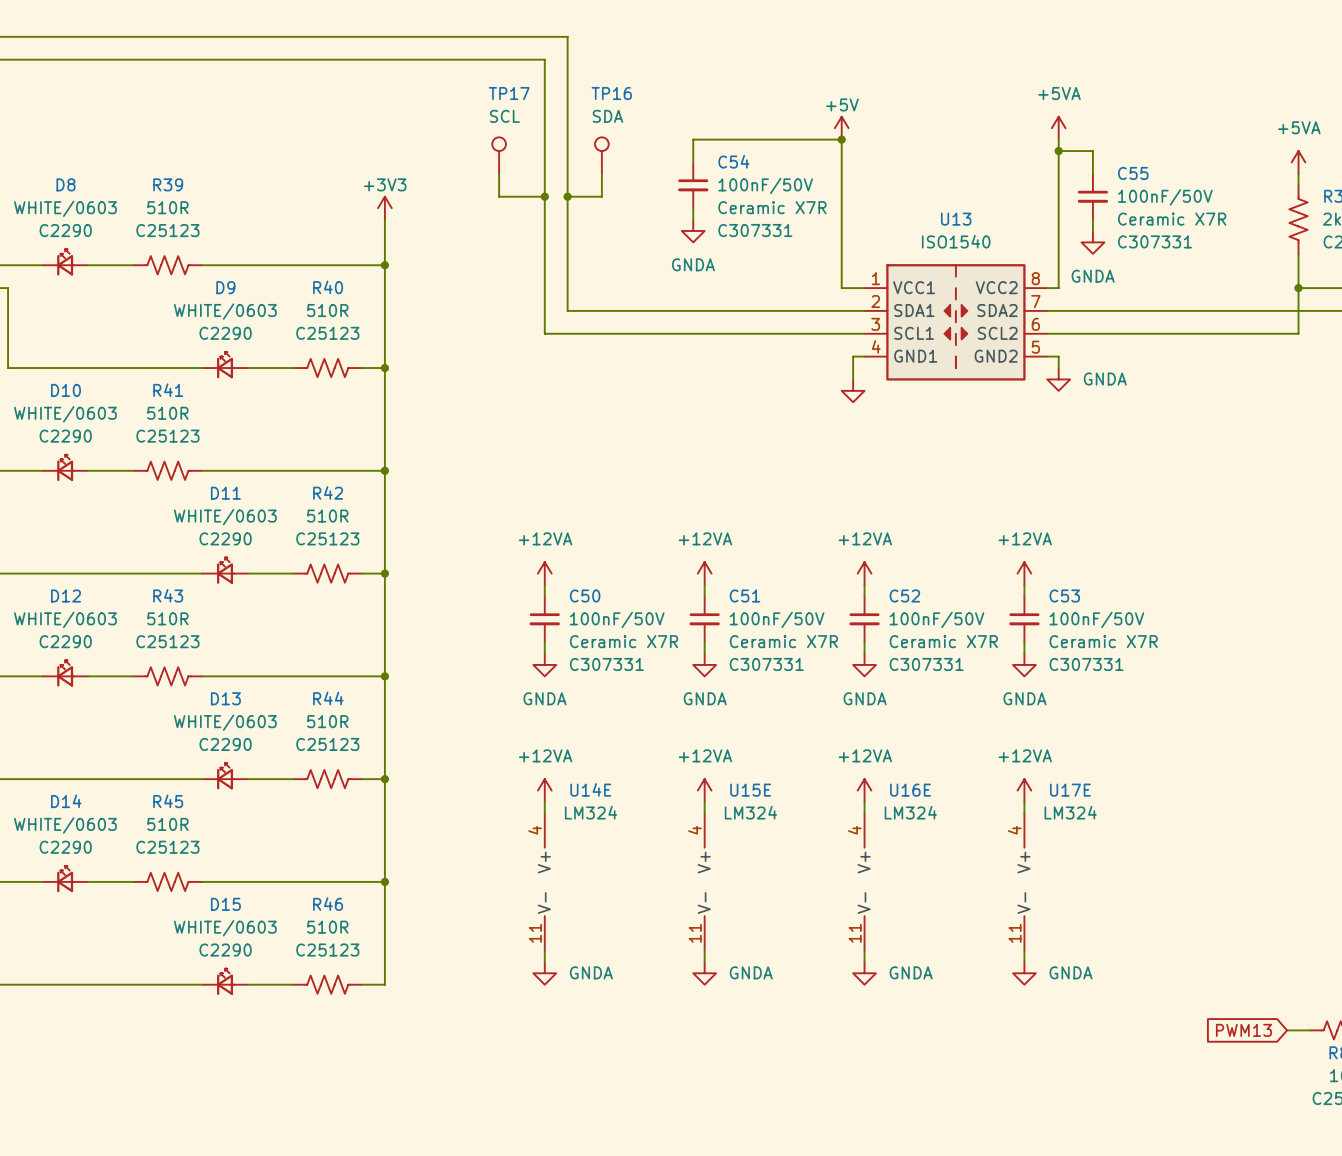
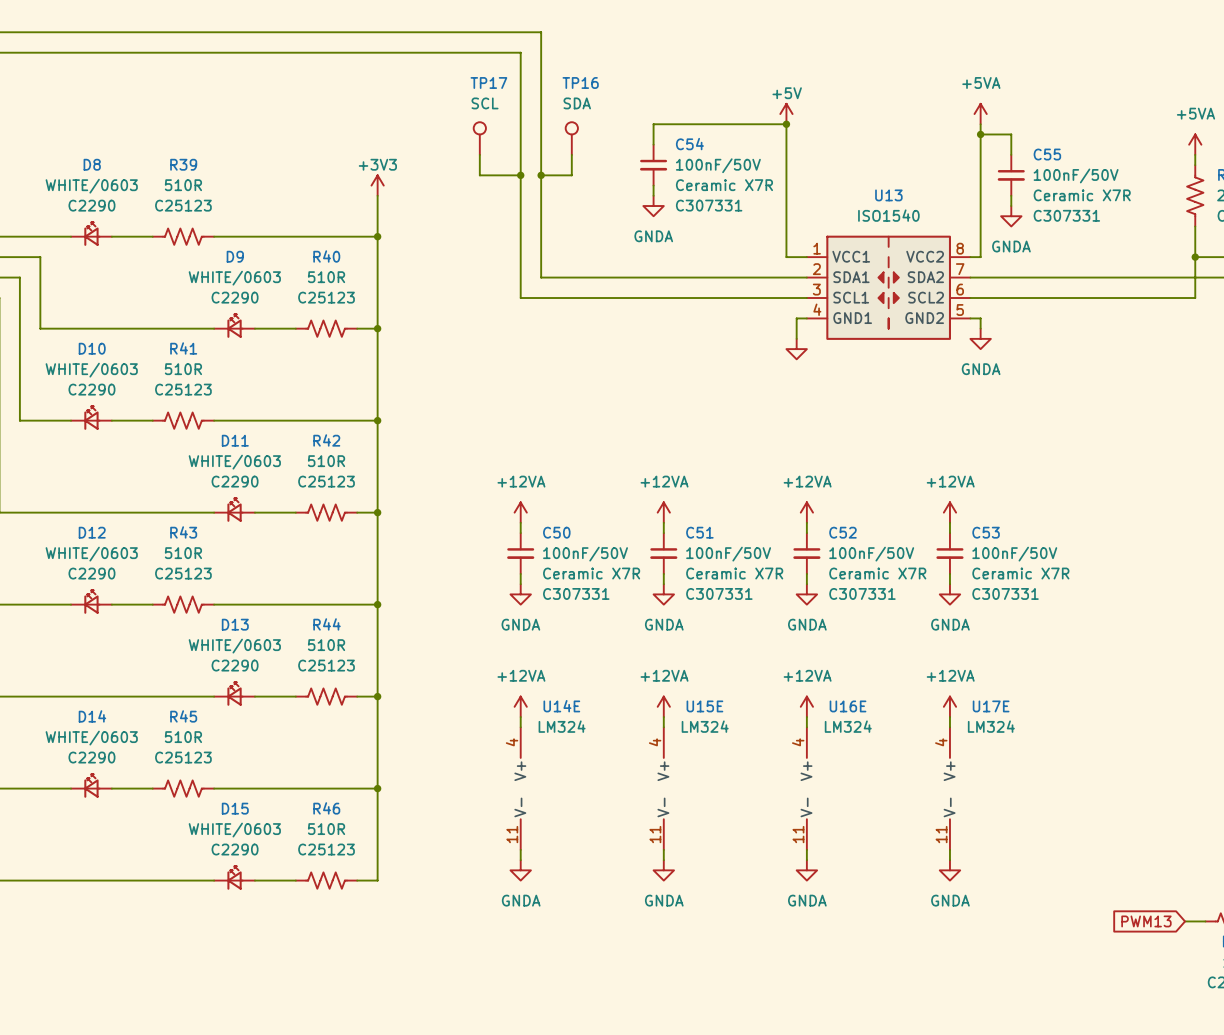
power symbol text position: GNDA (1105, 379) -> GNDA (981, 369)
power symbol text position: GNDA (591, 972) -> GNDA (521, 900)
power symbol text position: GNDA (751, 972) -> GNDA (664, 900)
power symbol text position: GNDA (911, 972) -> GNDA (807, 900)
power symbol text position: GNDA (1071, 972) -> GNDA (950, 900)

